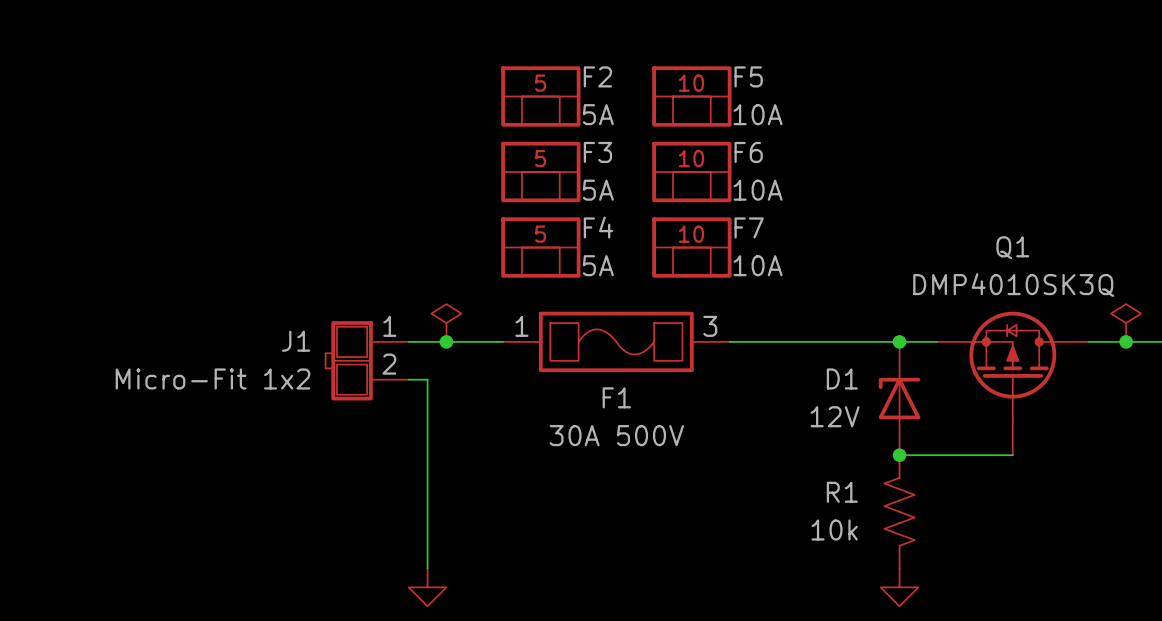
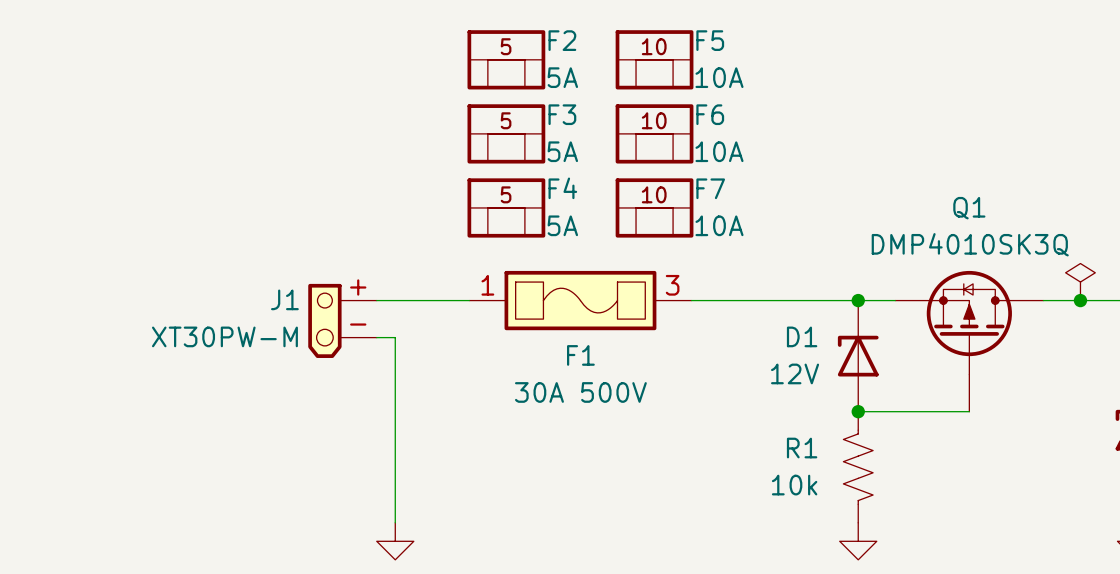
J1 symbol: [325, 321, 409, 401] -> [308, 283, 377, 358]
power symbol: (446, 323) -> none
junction: (446, 341) -> none
J1 value: Micro-Fit 1x2 (213, 378) -> XT30PW-M (224, 336)

